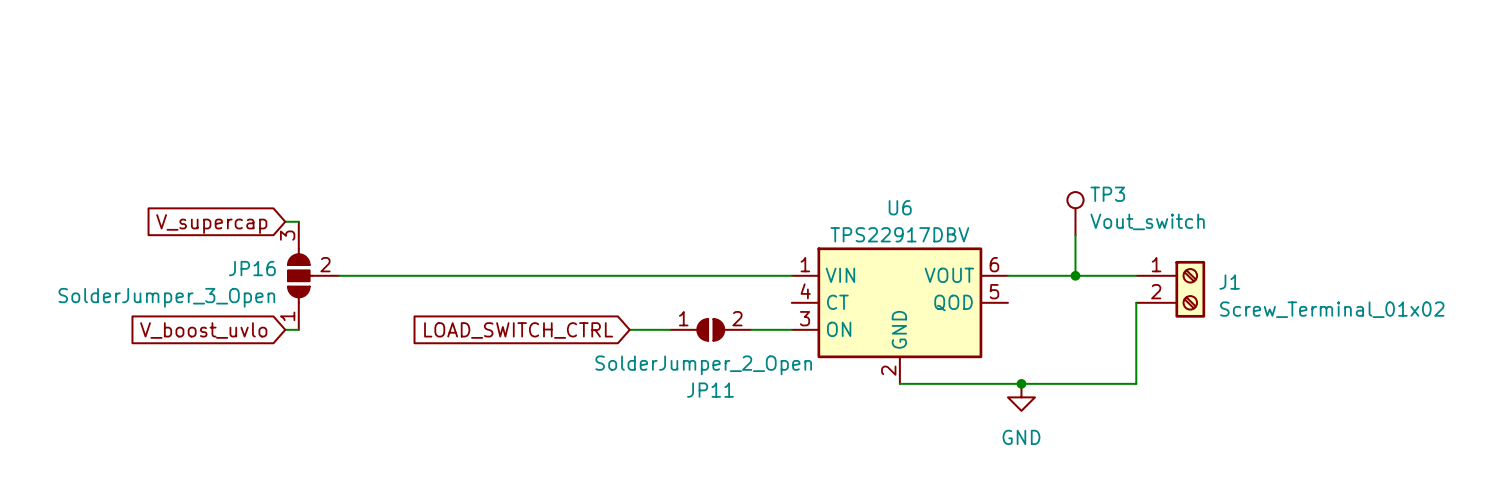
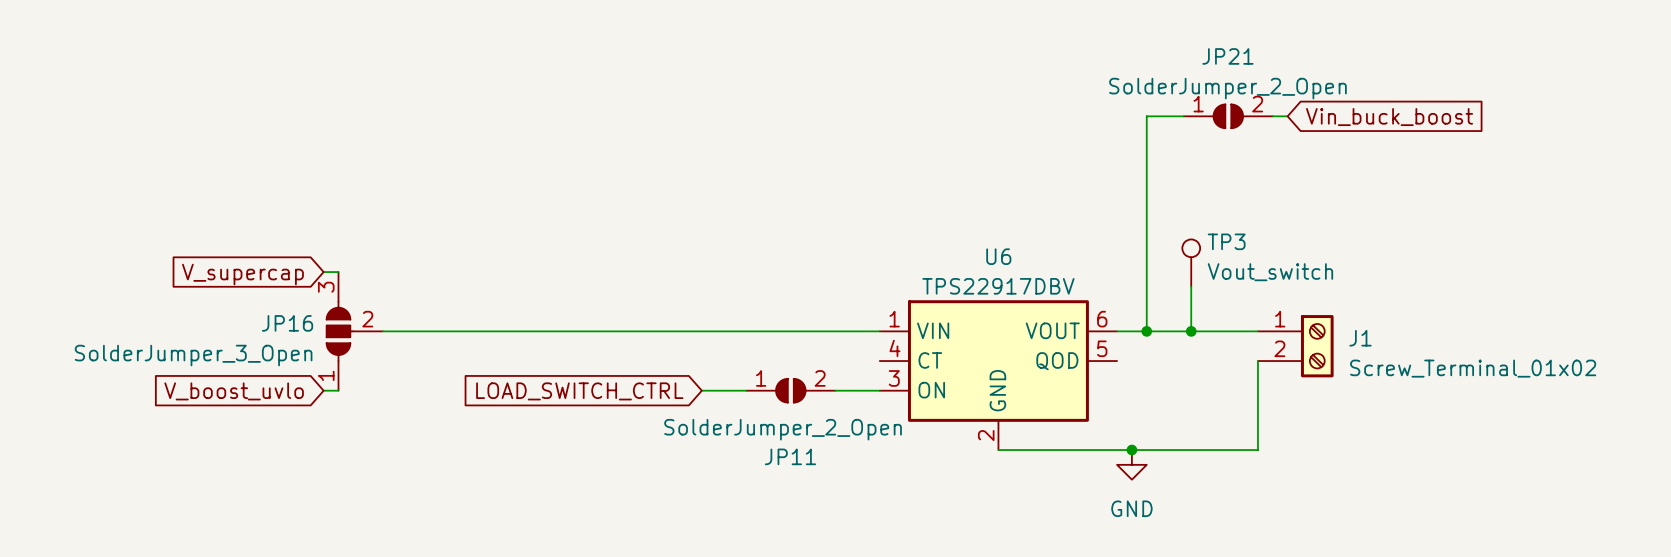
wire: none -> (1183, 116) (1146, 116) (1146, 331)
JP21: none -> SolderJumper_2_Open (1228, 116)
wire: none -> (1272, 116) (1287, 116)
global label: none -> Vin_buck_boost (1389, 117)
junction: none -> (1146, 331)

